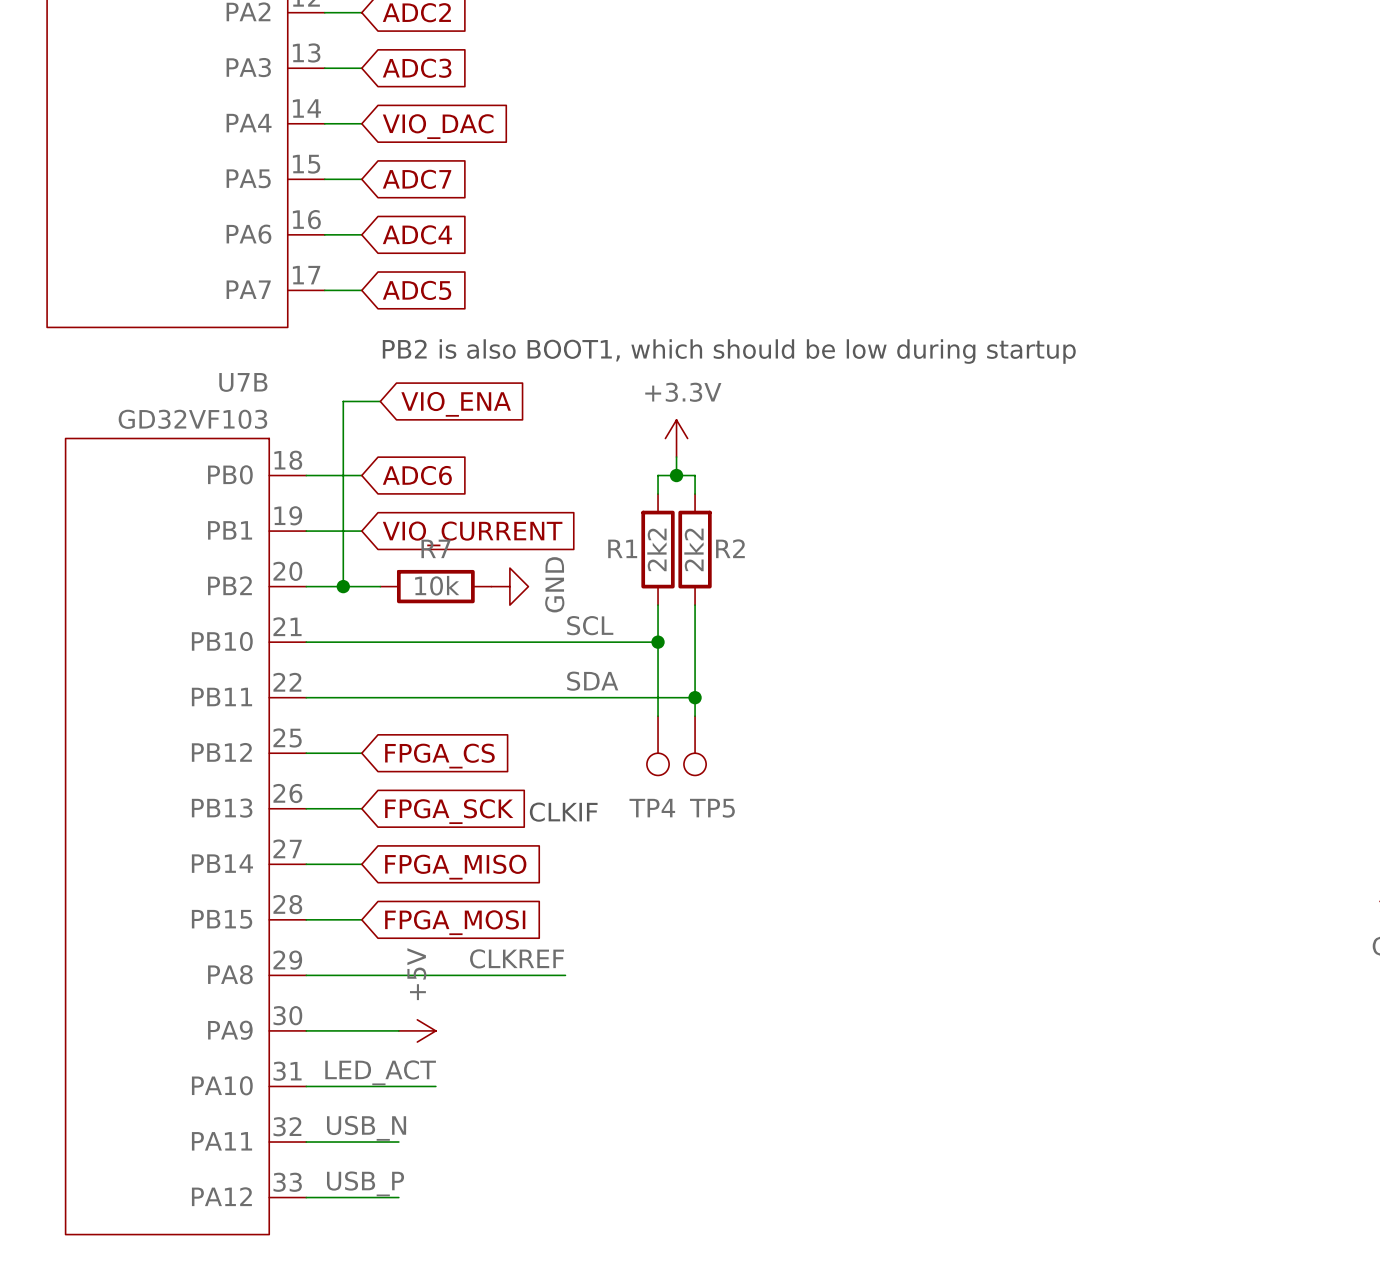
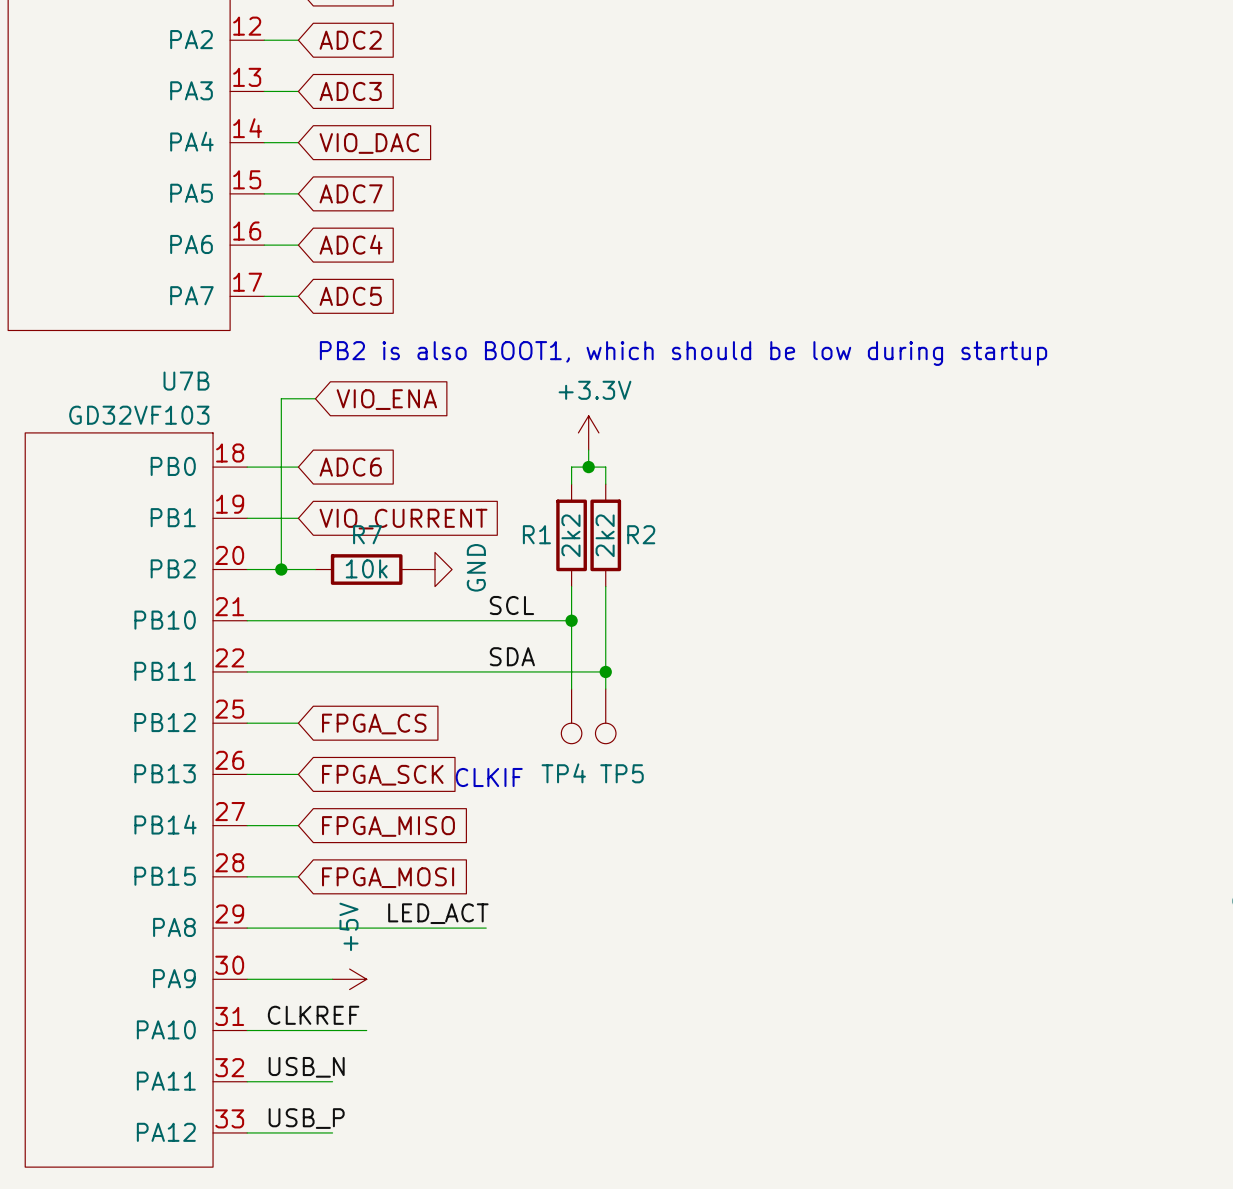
label position: CLKREF (517, 958) -> CLKREF (313, 1015)
label position: LED_ACT (380, 1072) -> LED_ACT (438, 913)

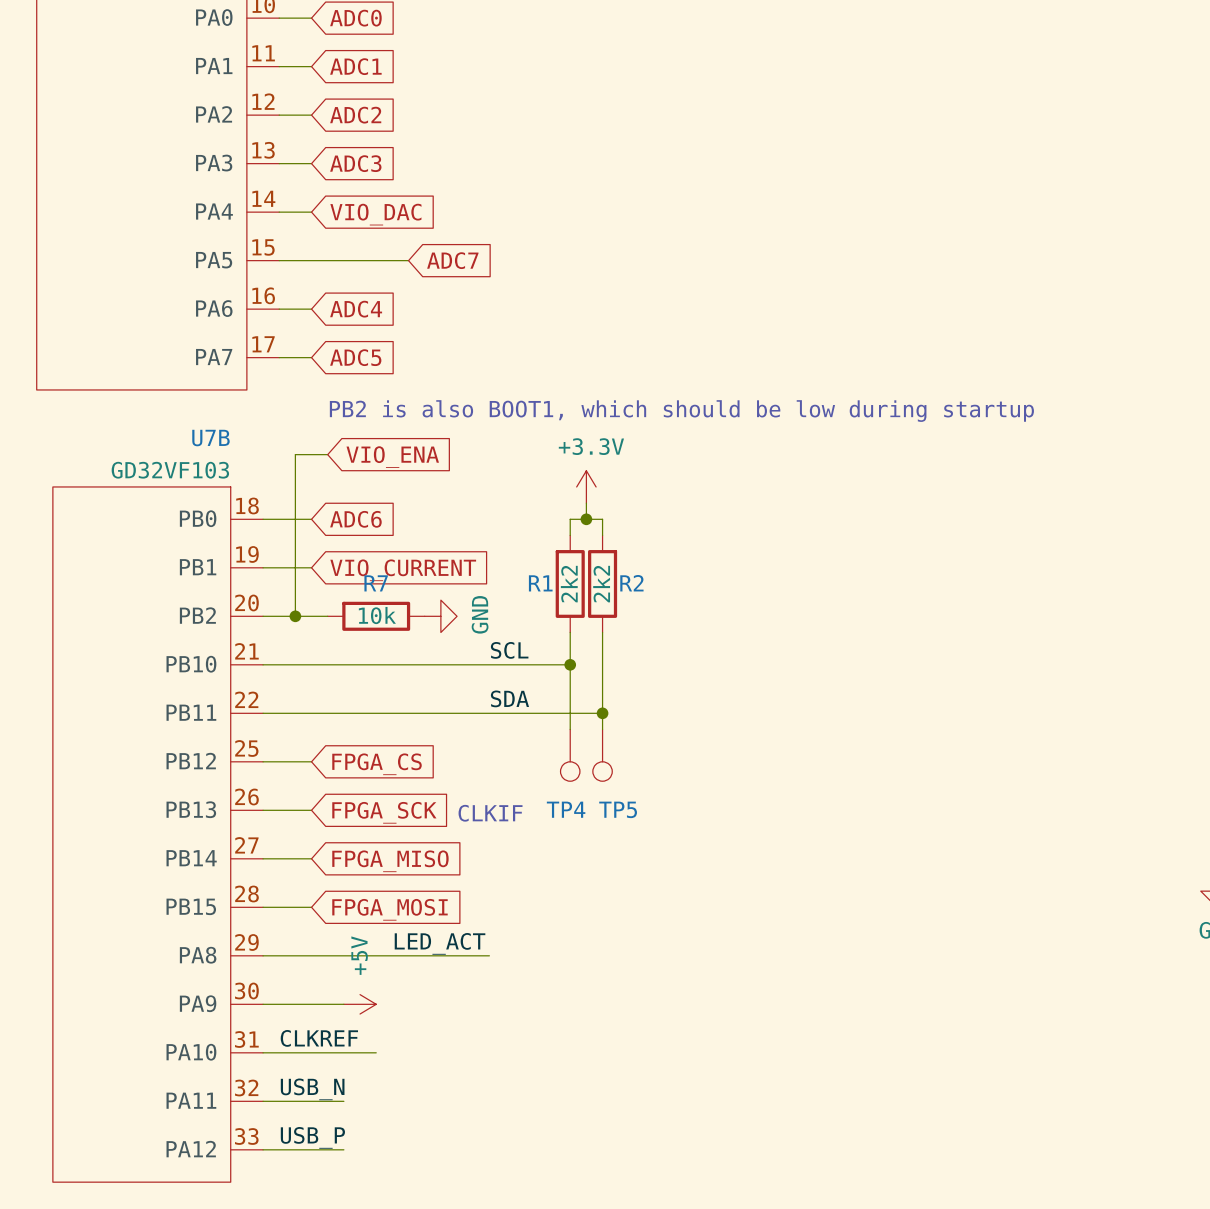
wire: none -> (311, 260) (408, 260)
global label position: ADC7 (351, 193) -> ADC7 (452, 260)

